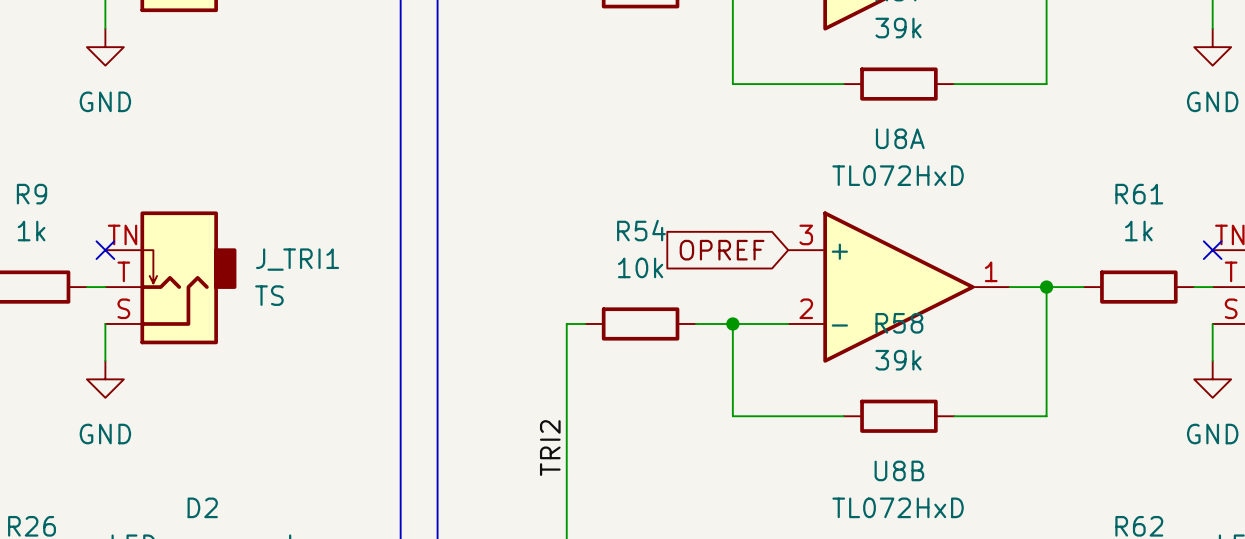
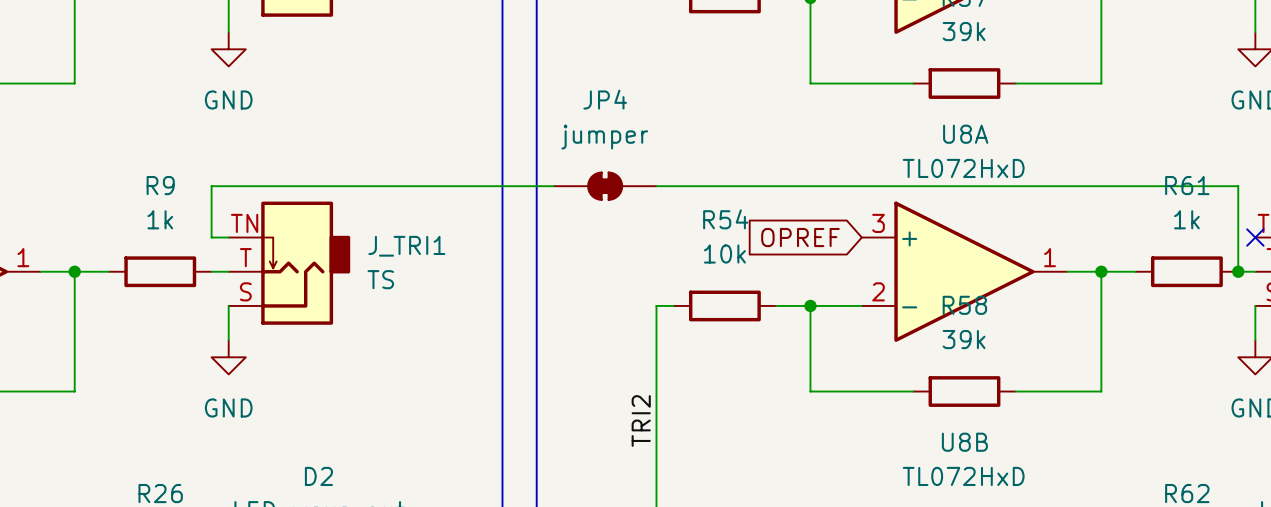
wire: none -> (553, 186) (211, 186) (211, 237) (228, 237)
JP4: none -> jumper (605, 186)
wire: none -> (656, 186) (1238, 186) (1238, 271)
no-connect mark: (105, 250) -> none
junction: none -> (1238, 271)

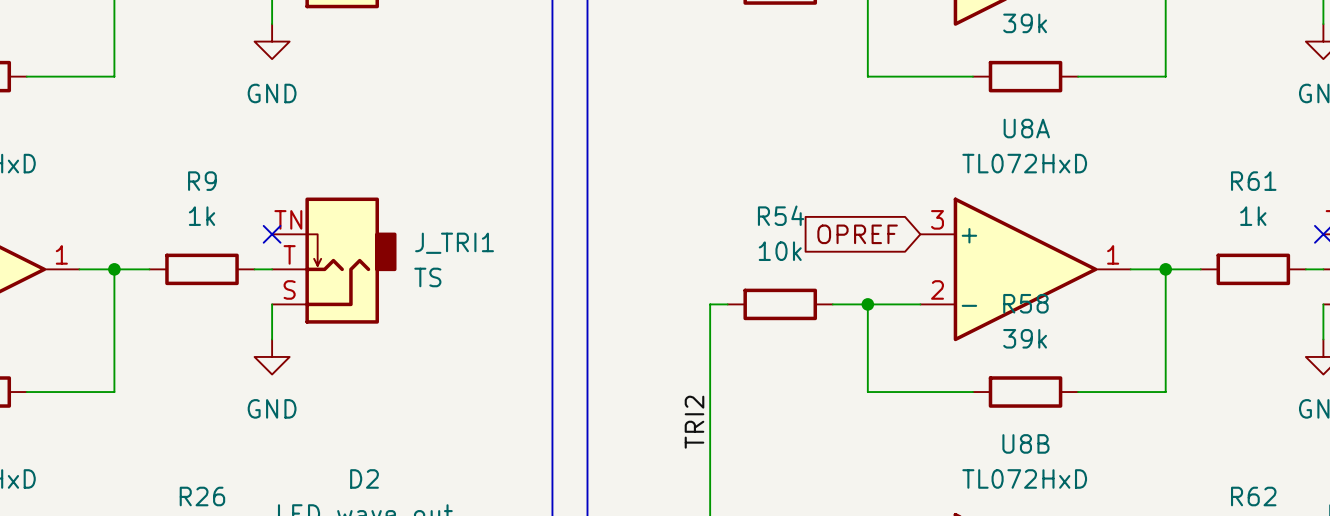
wire: (553, 186) (211, 186) (211, 237) (228, 237) -> none
JP4: jumper (605, 186) -> none
wire: (656, 186) (1238, 186) (1238, 271) -> none
no-connect mark: none -> (272, 234)
junction: (1238, 271) -> none

